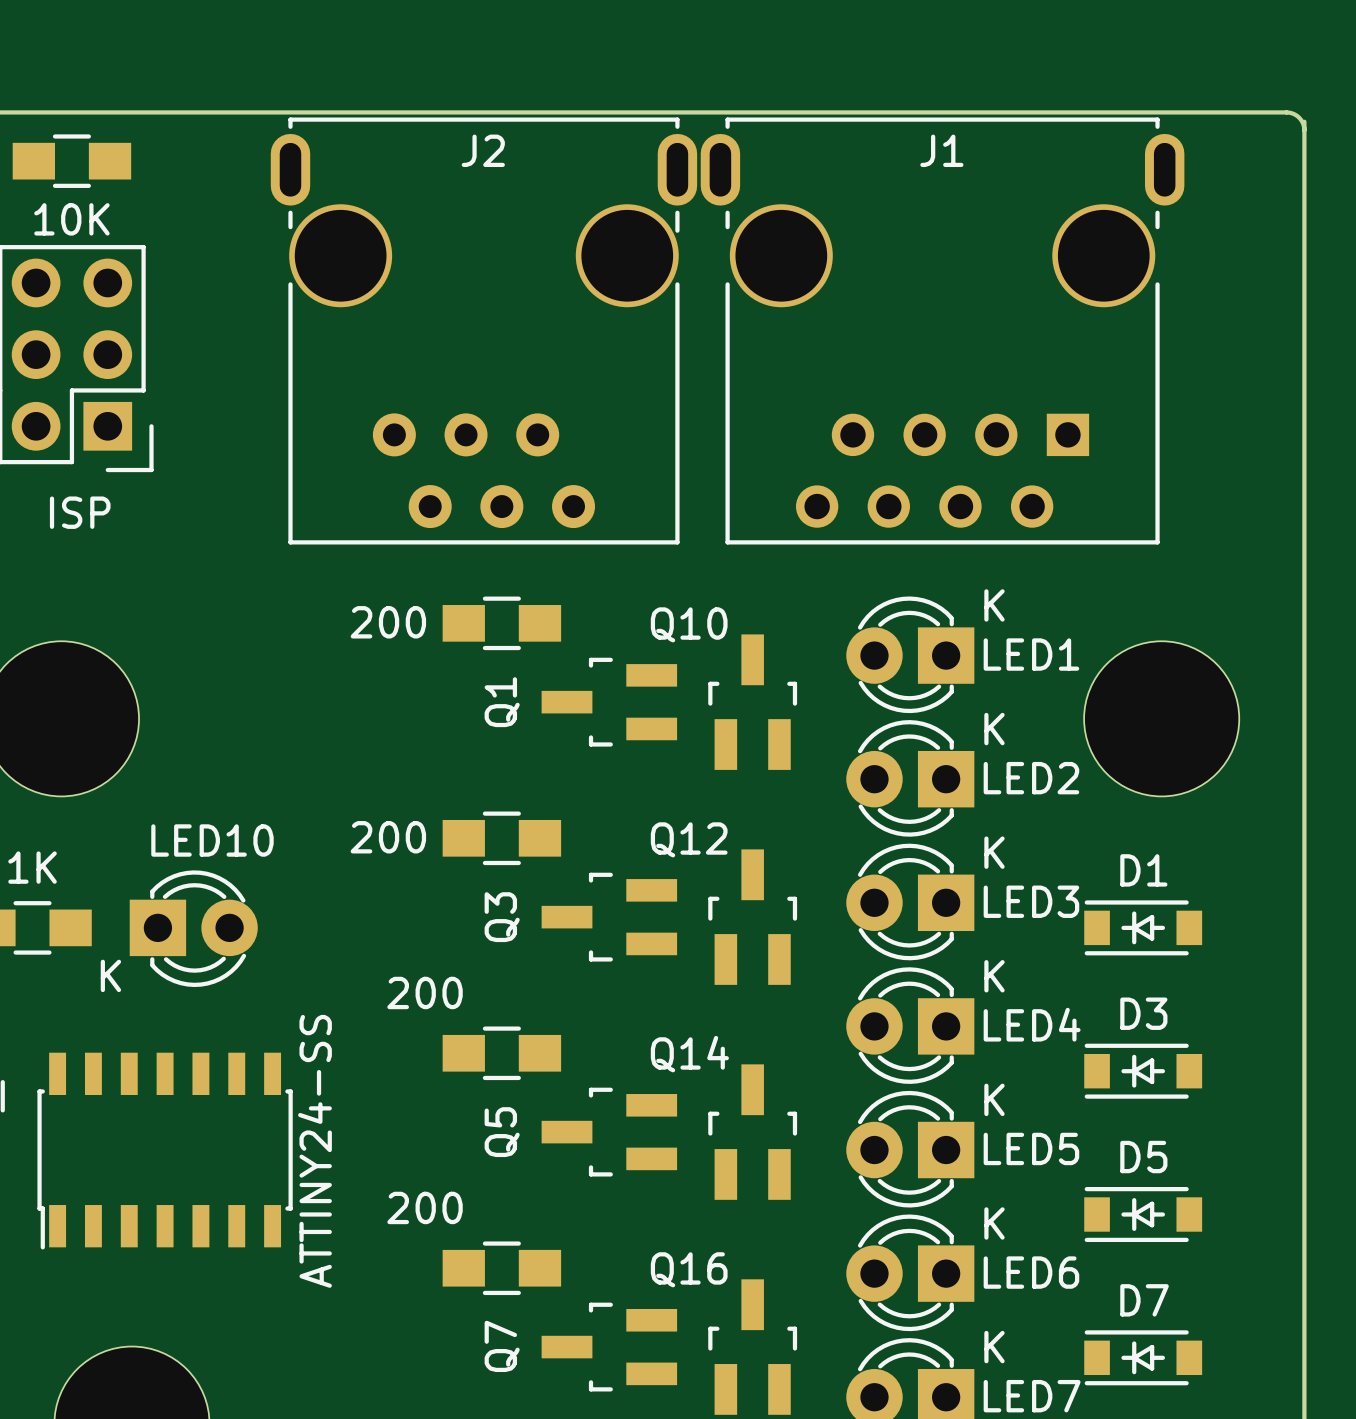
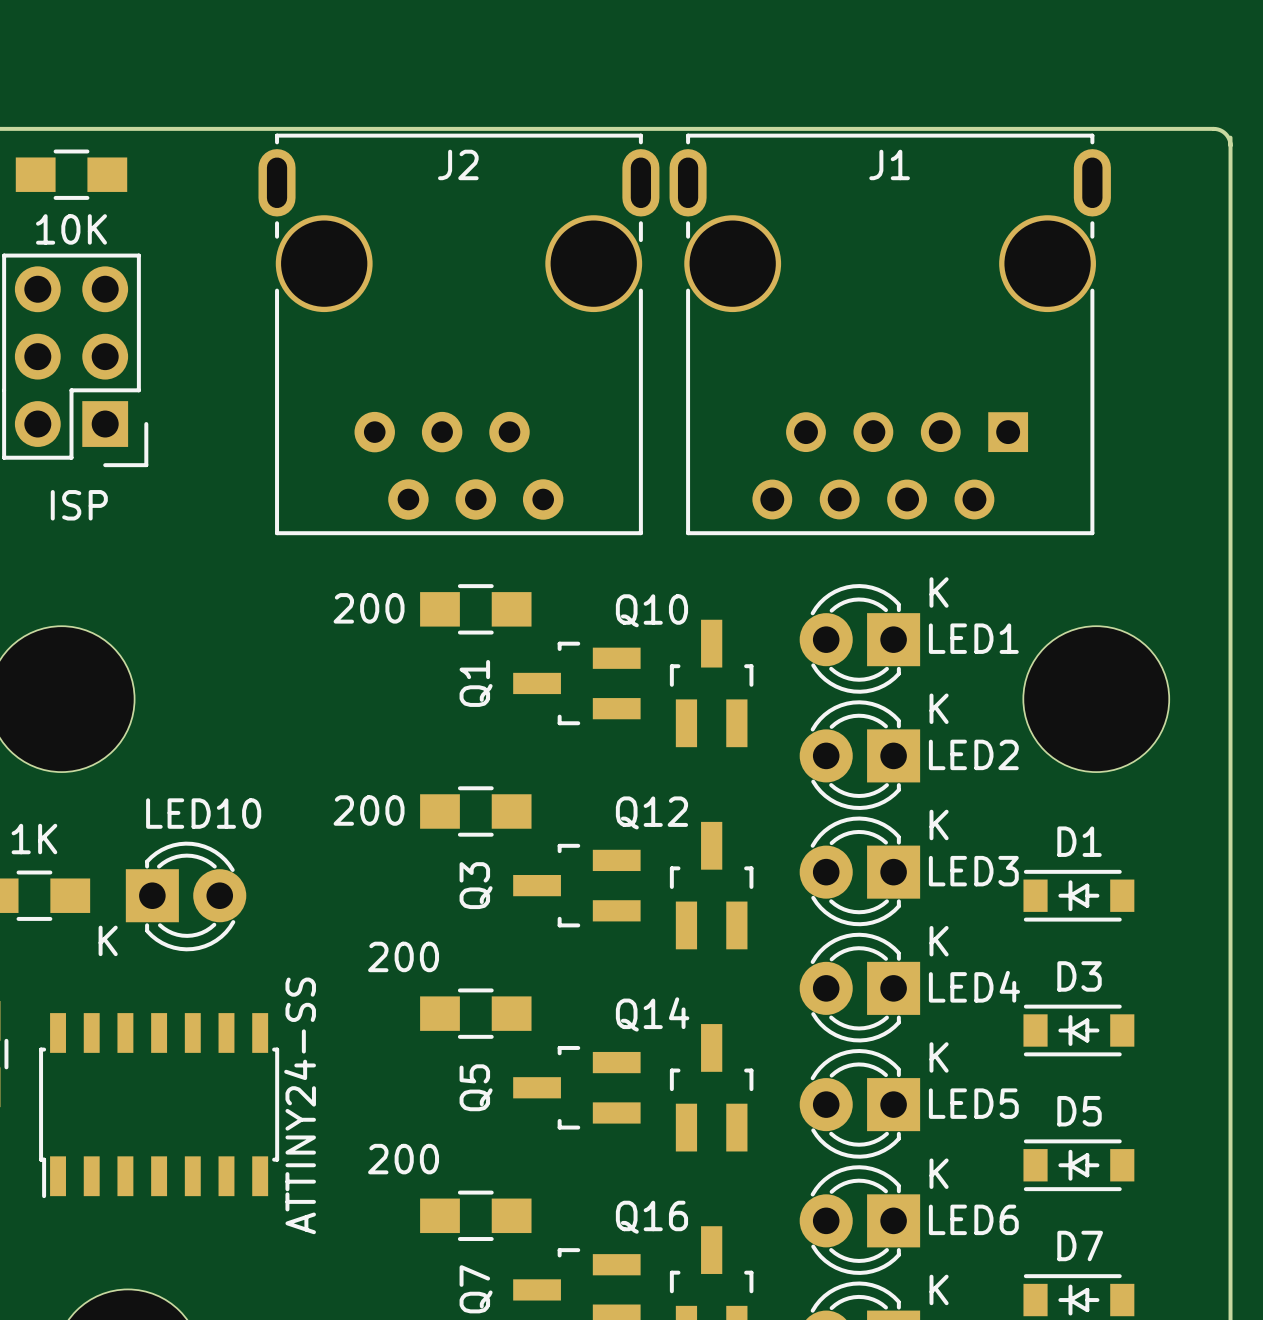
J1 footprint: [700, 117, 1185, 545] -> [669, 133, 1111, 536]

